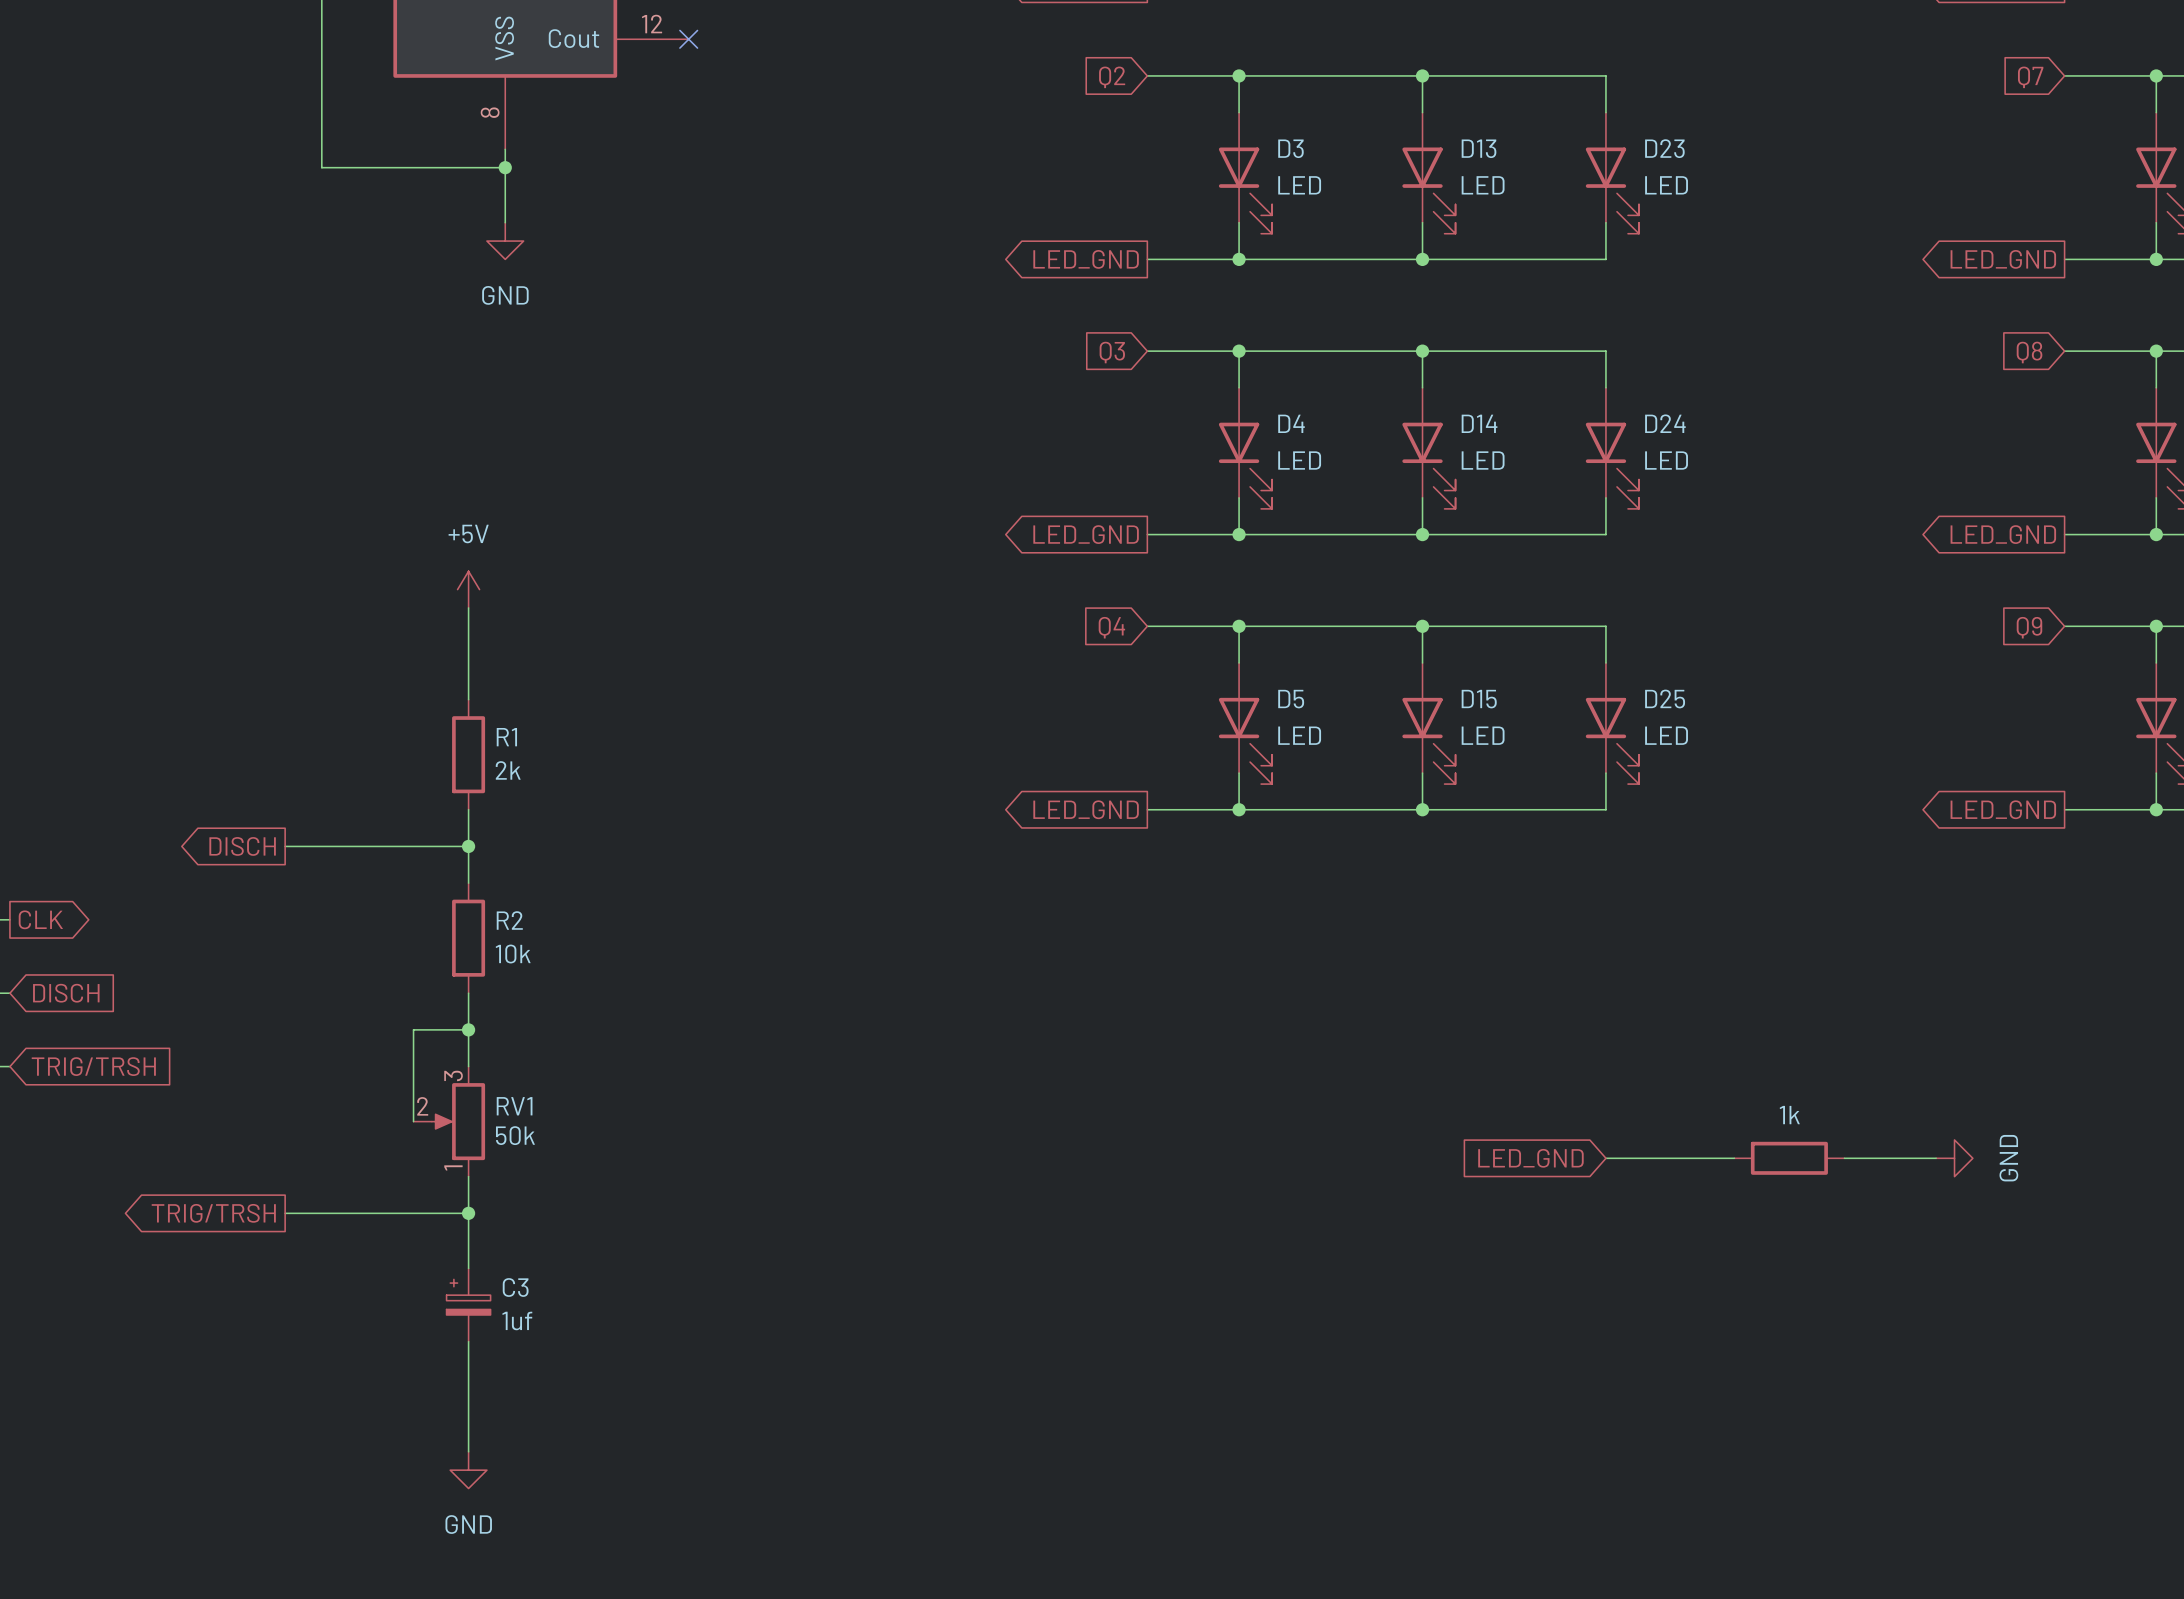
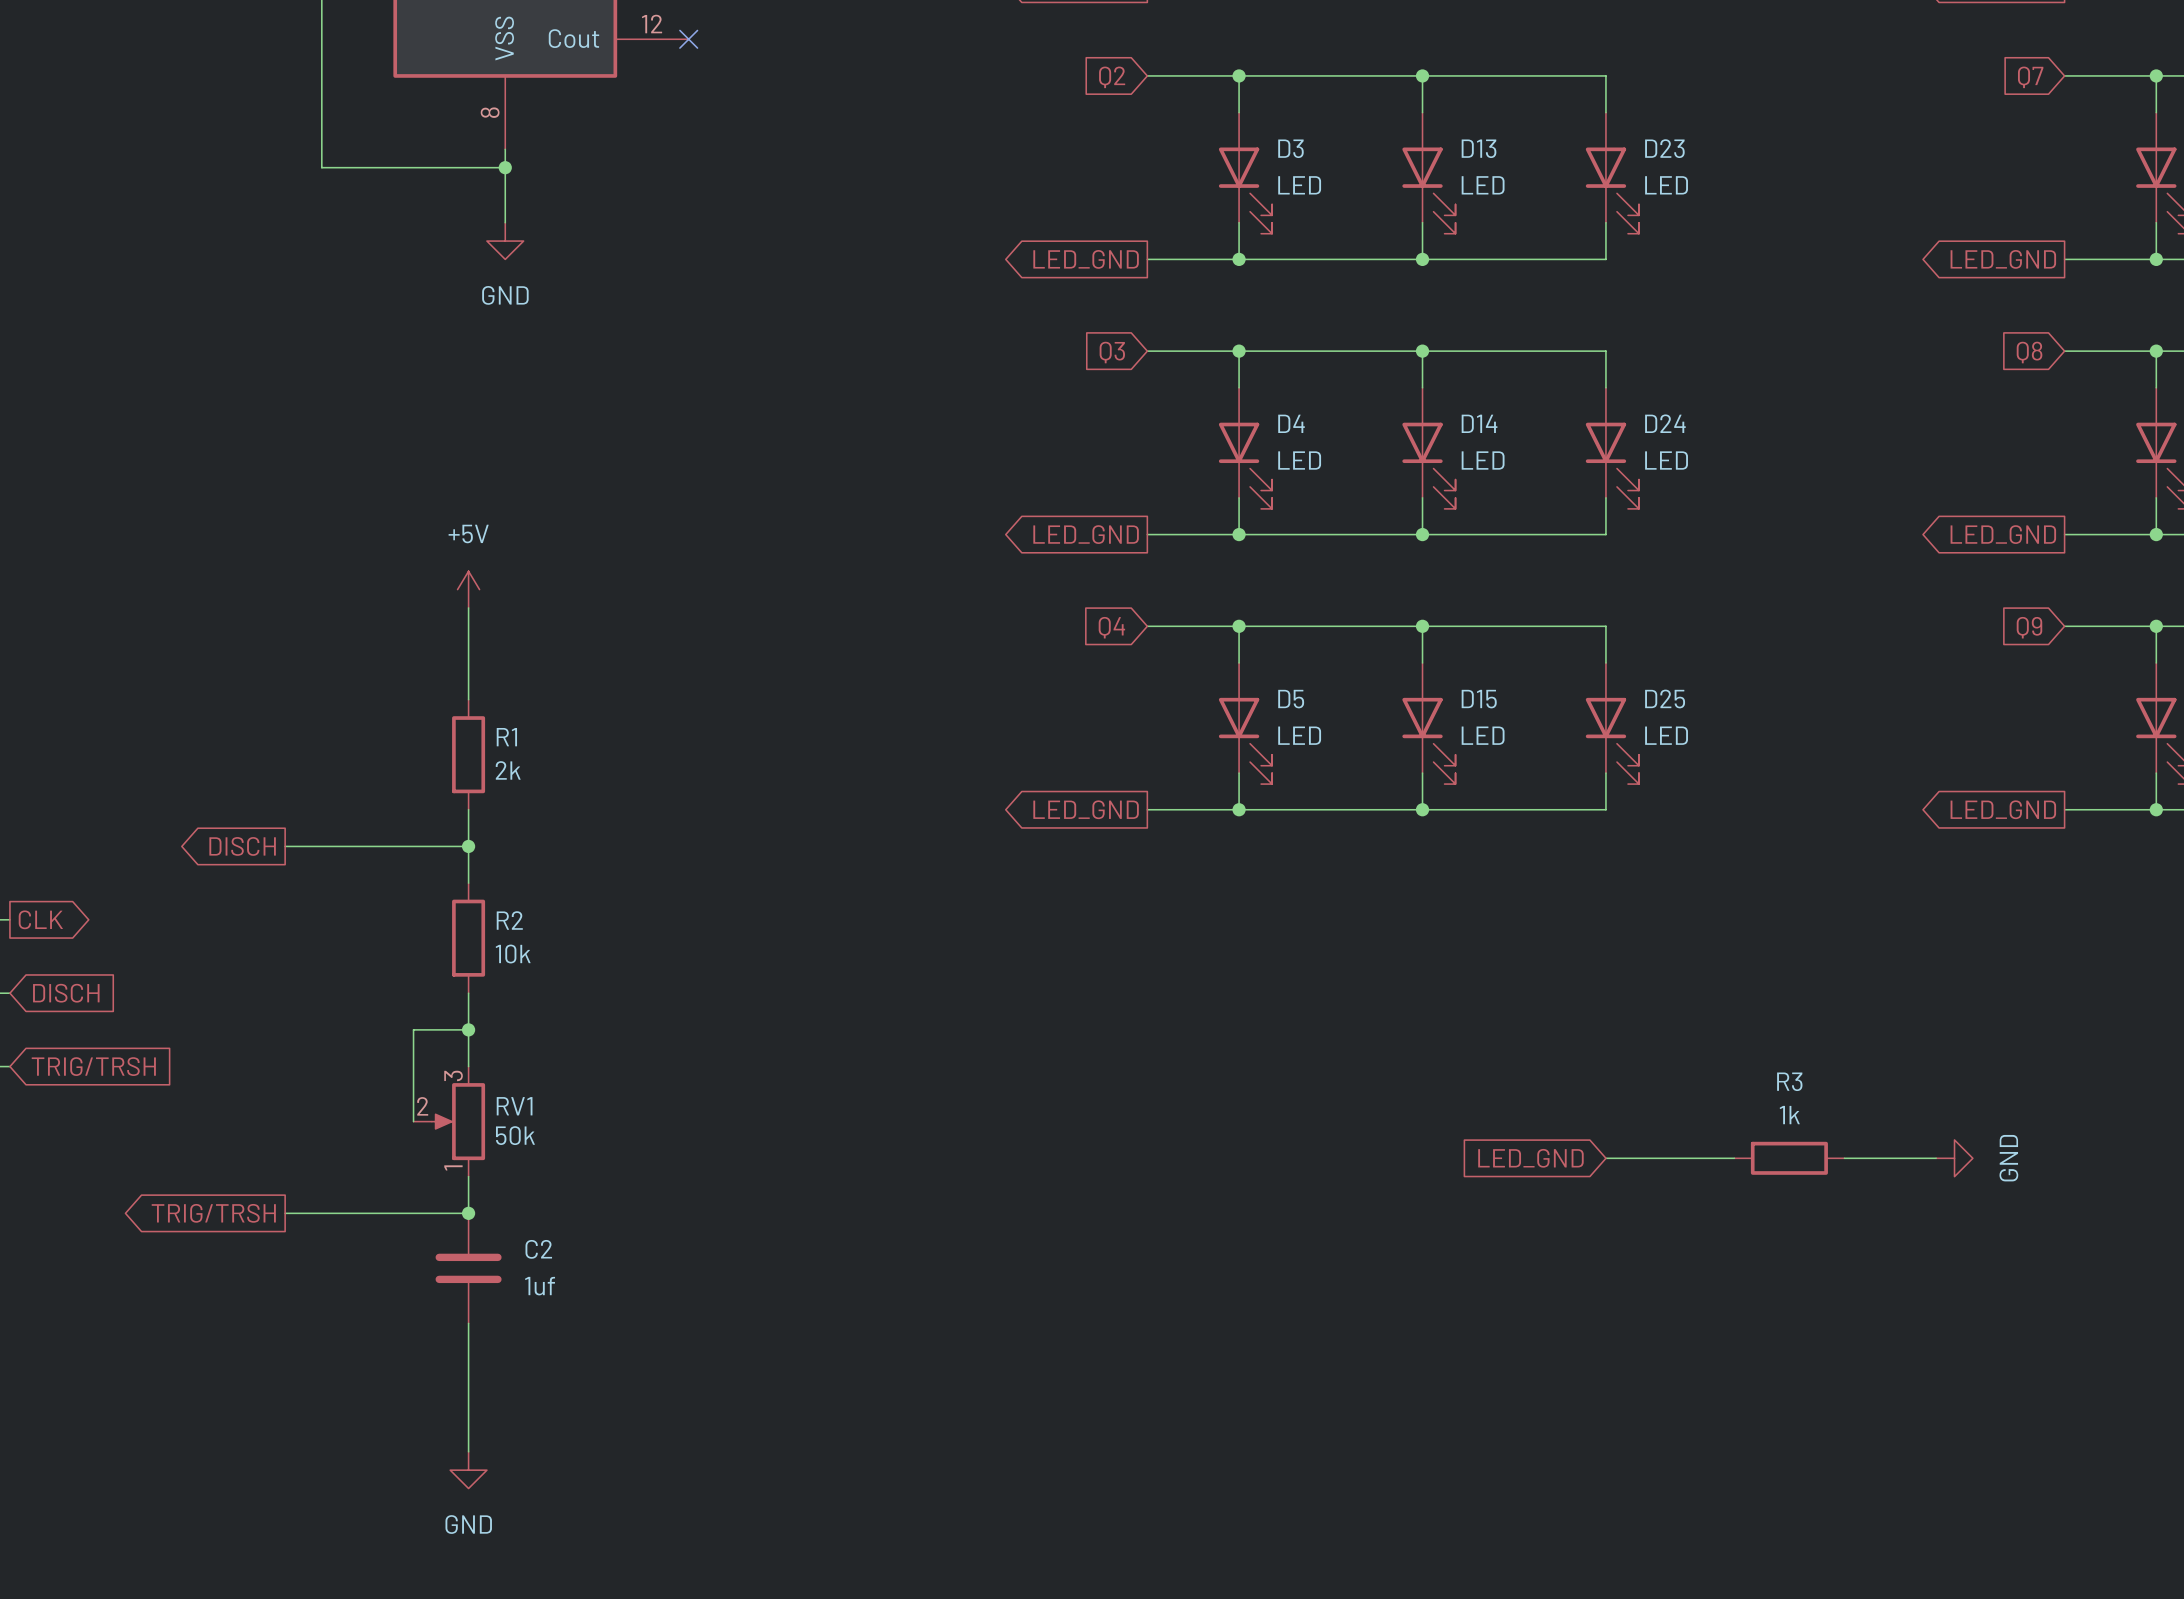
R3 name: none -> R3 (1789, 1081)
C2: none -> 1uf (468, 1268)
C3: 1uf (468, 1305) -> none

